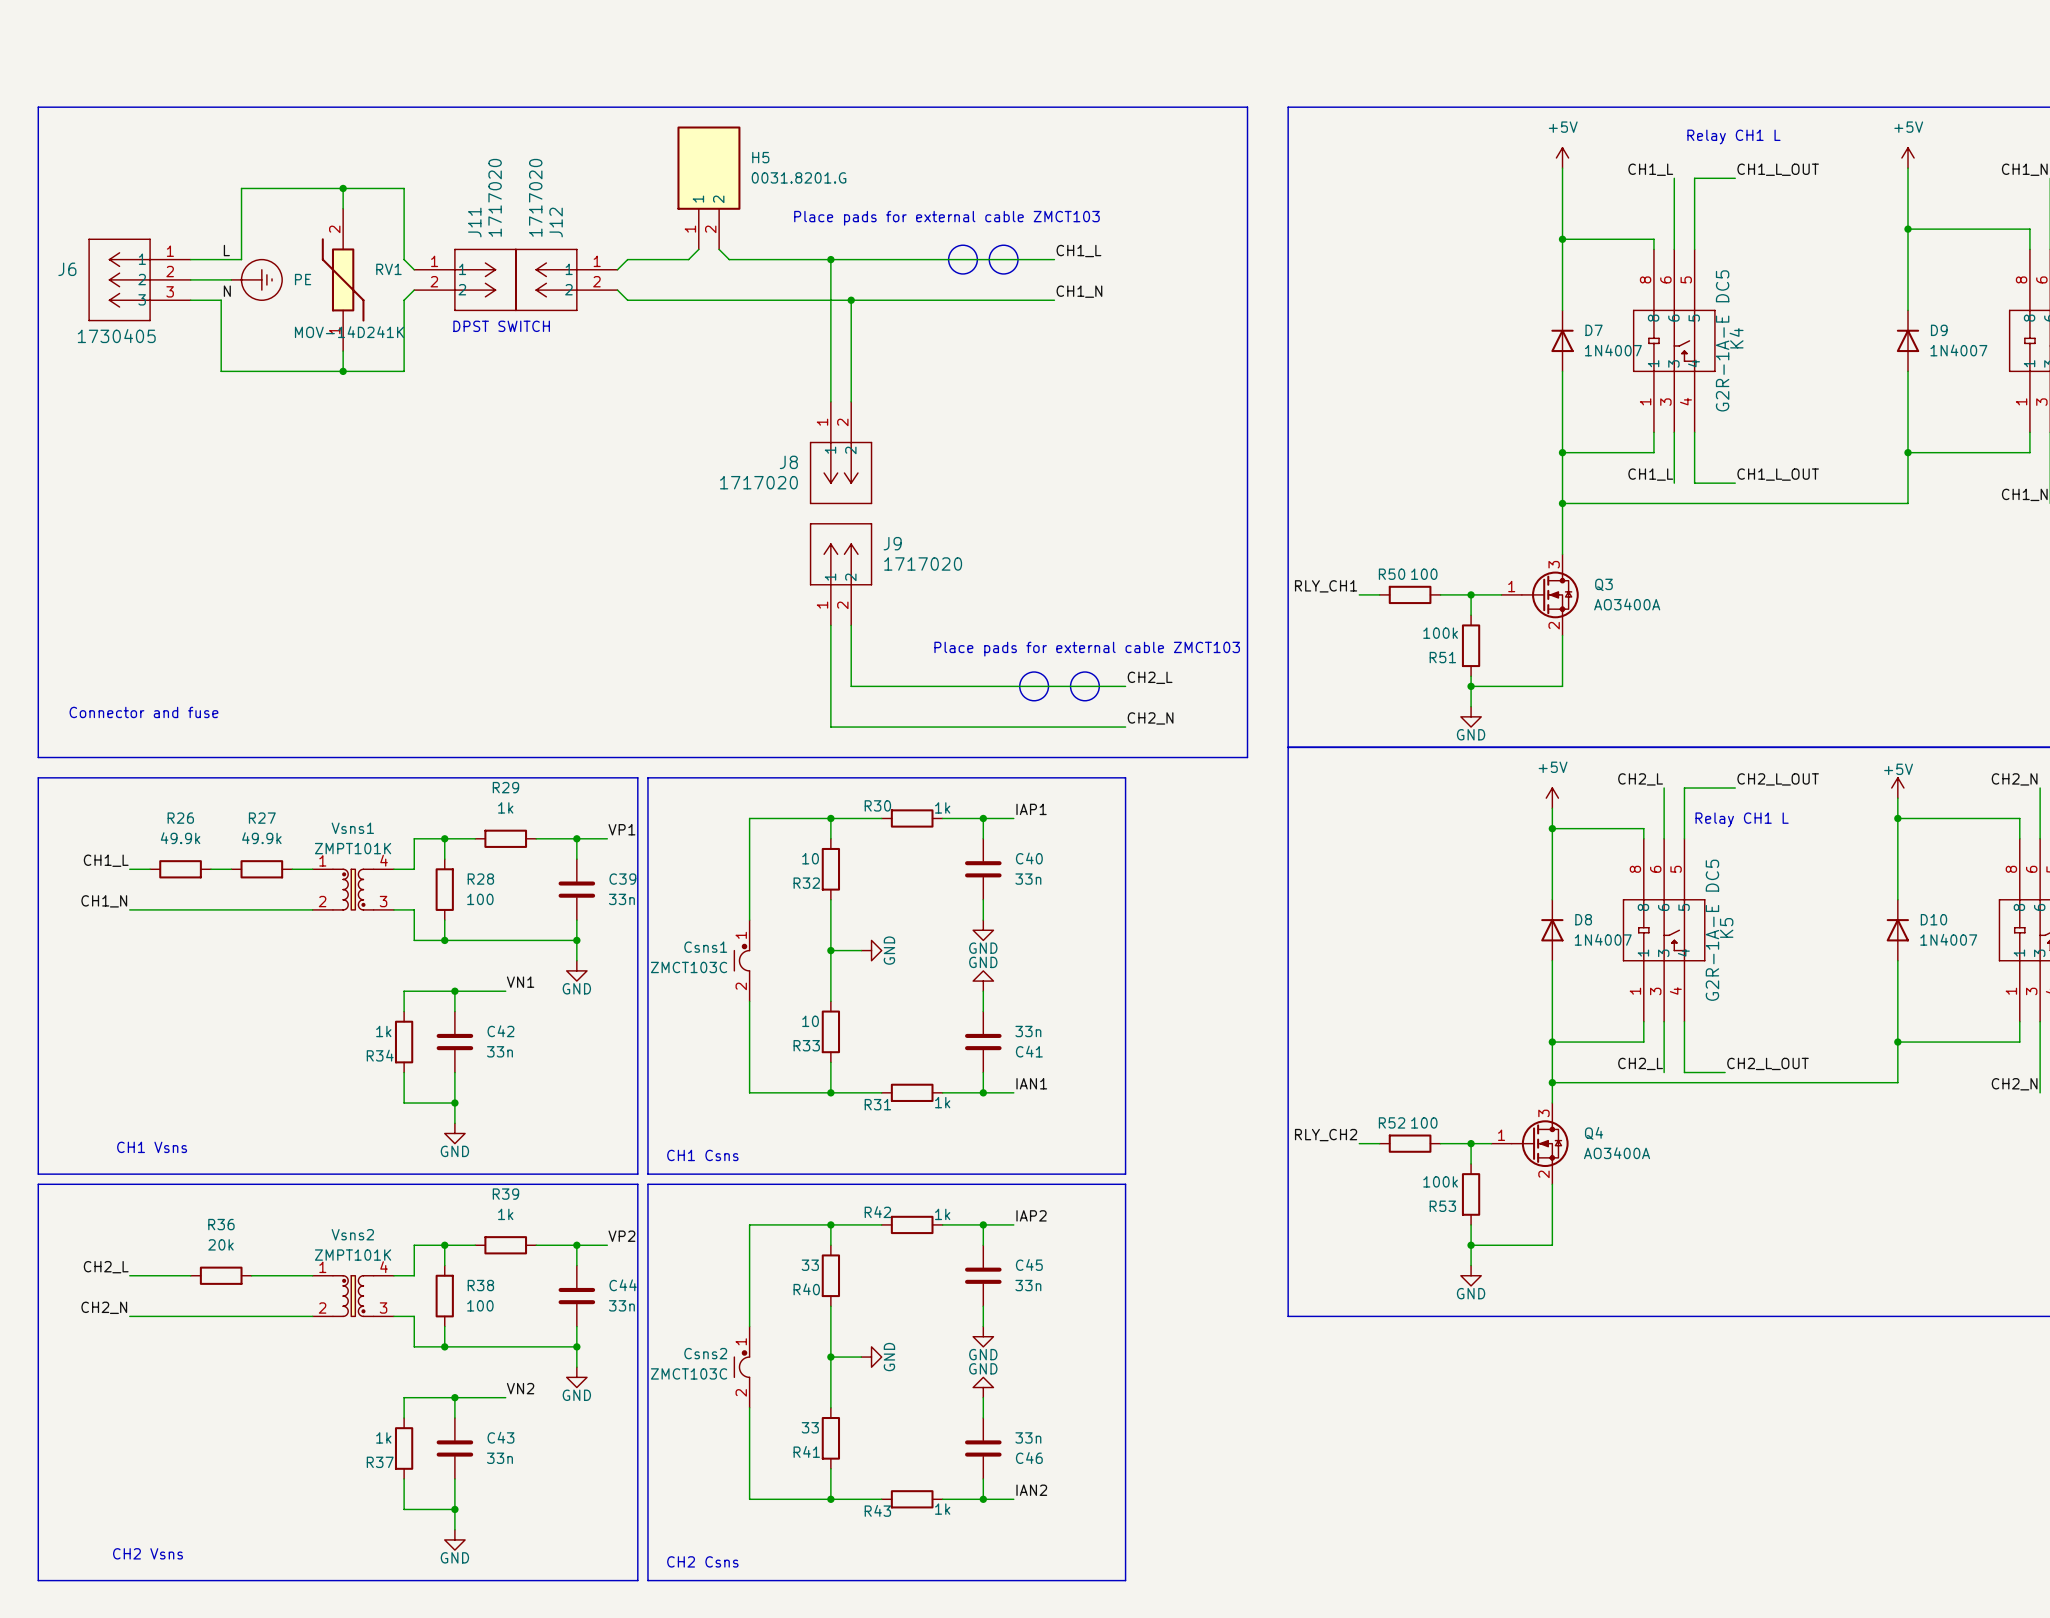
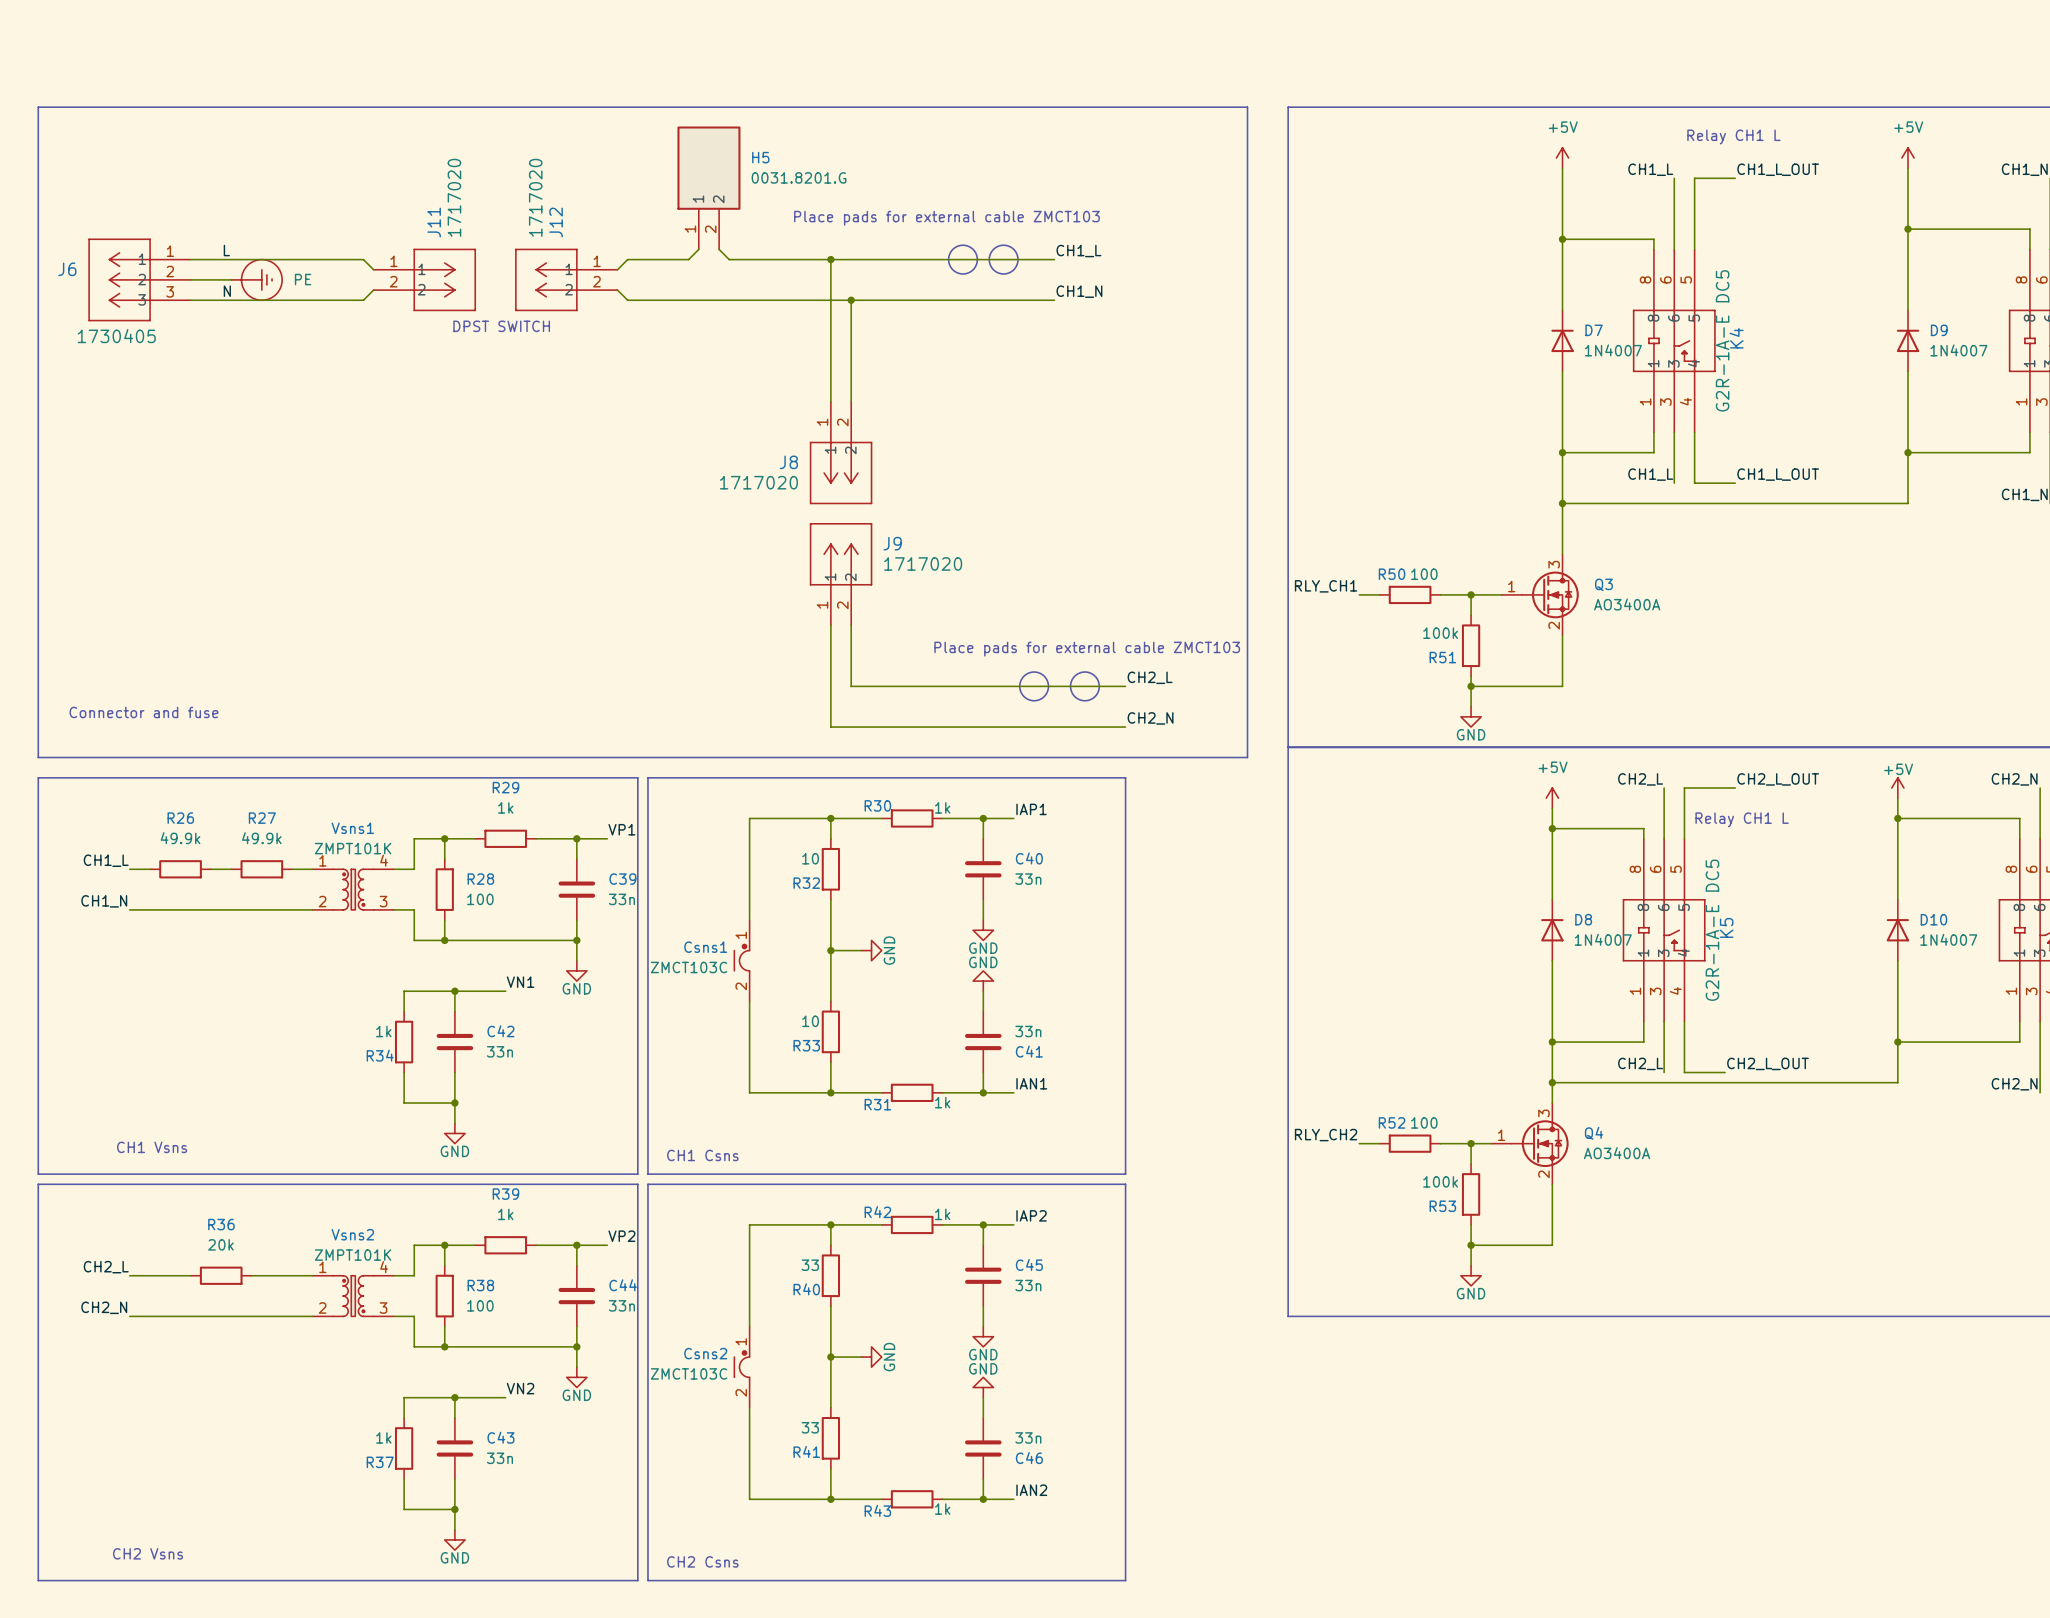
wire: (343, 188) (343, 208) -> none
junction: (343, 188) -> none
wire: (241, 259) (241, 188) (404, 188) (404, 259) (414, 269) -> (241, 259) (363, 259) (373, 269)
RV1: MOV-14D241K (343, 279) -> none
J11 position: (465, 279) -> (424, 279)
wire: (414, 290) (404, 300) (404, 371) (221, 371) (221, 300) -> (373, 290) (363, 300) (221, 300)
wire: (343, 351) (343, 371) -> none
junction: (343, 371) -> none

